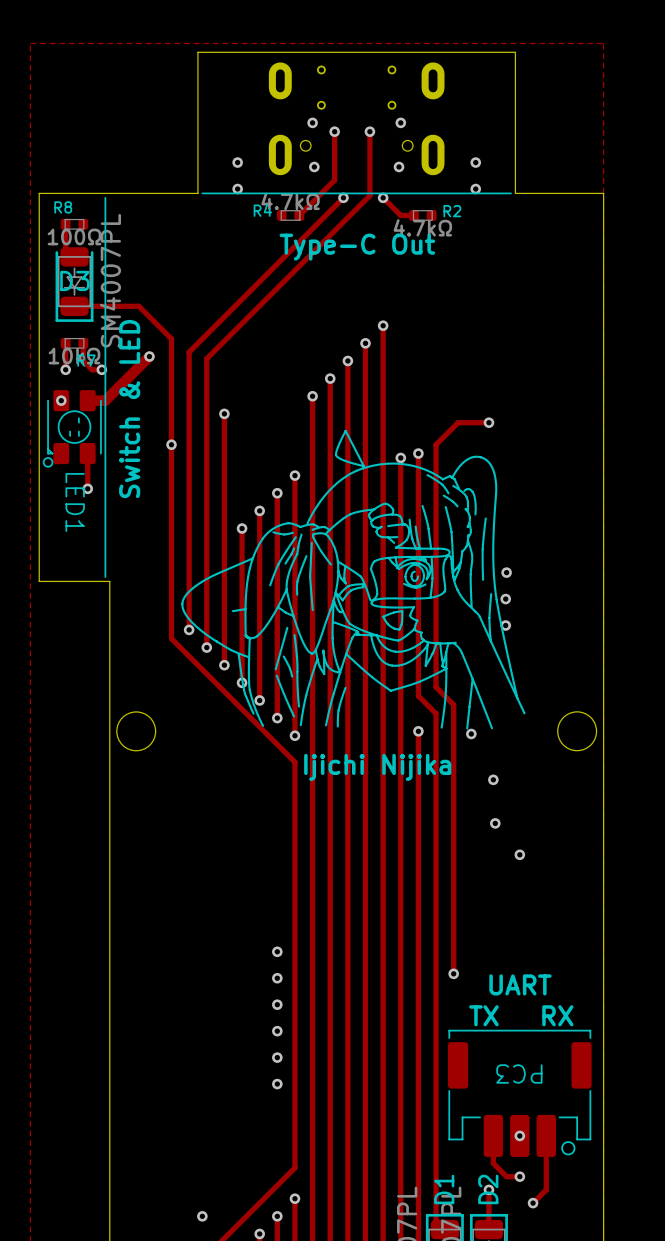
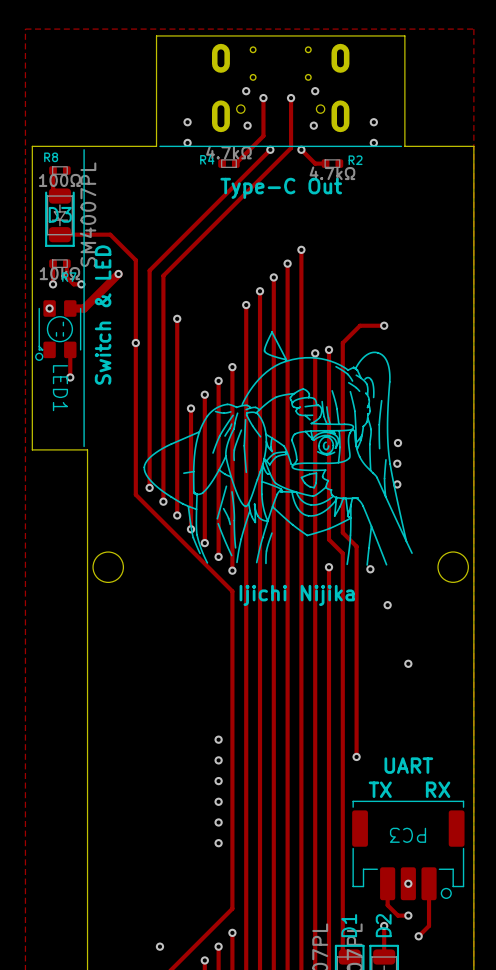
via: (495, 823) -> none

